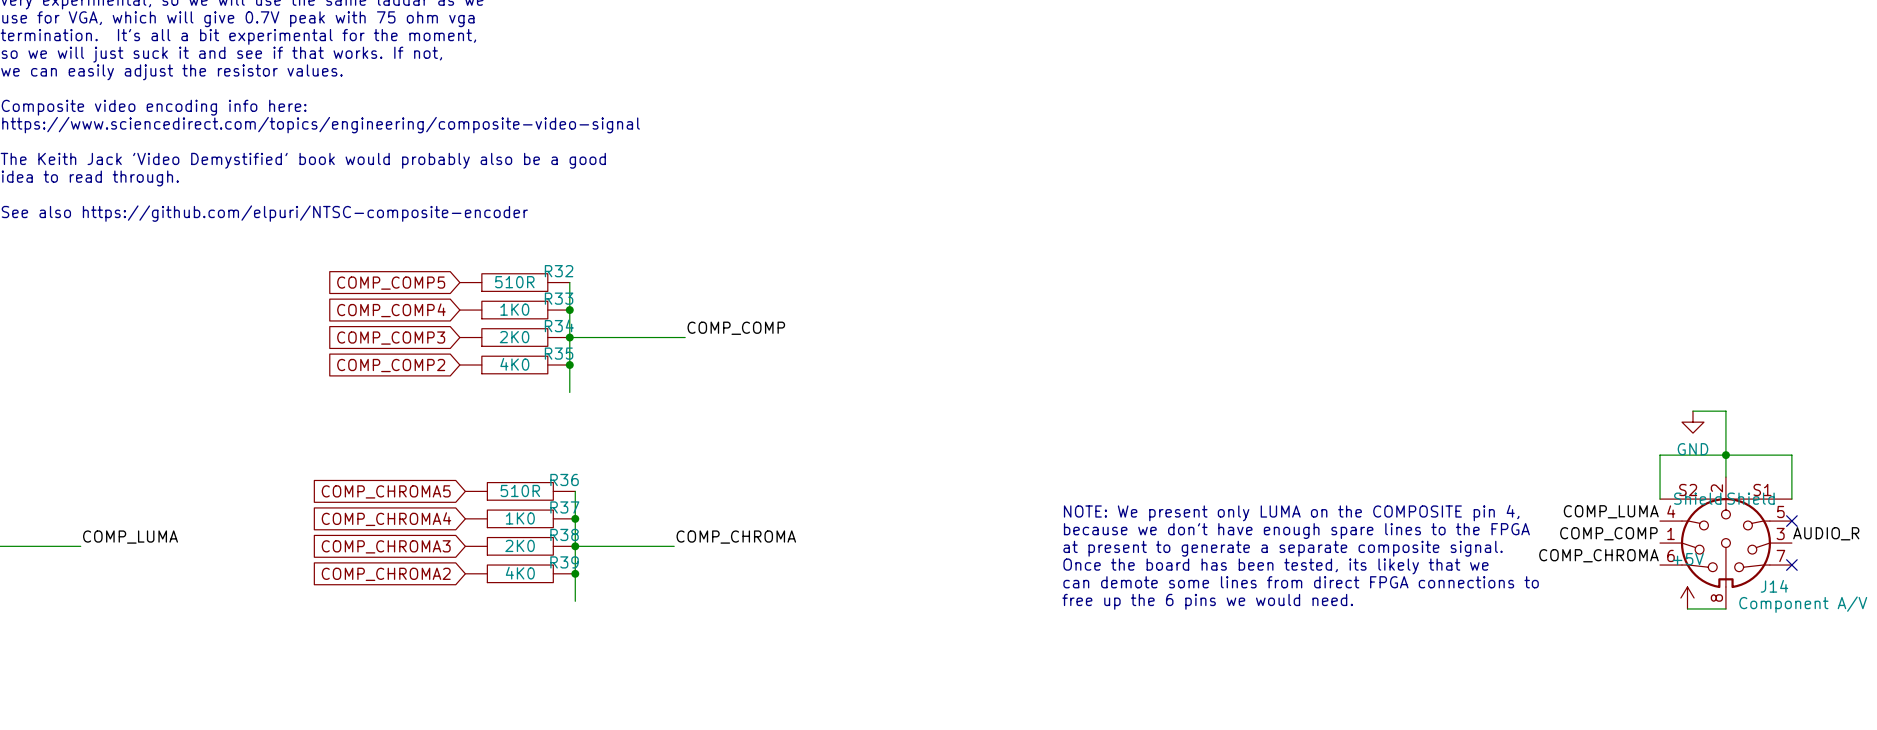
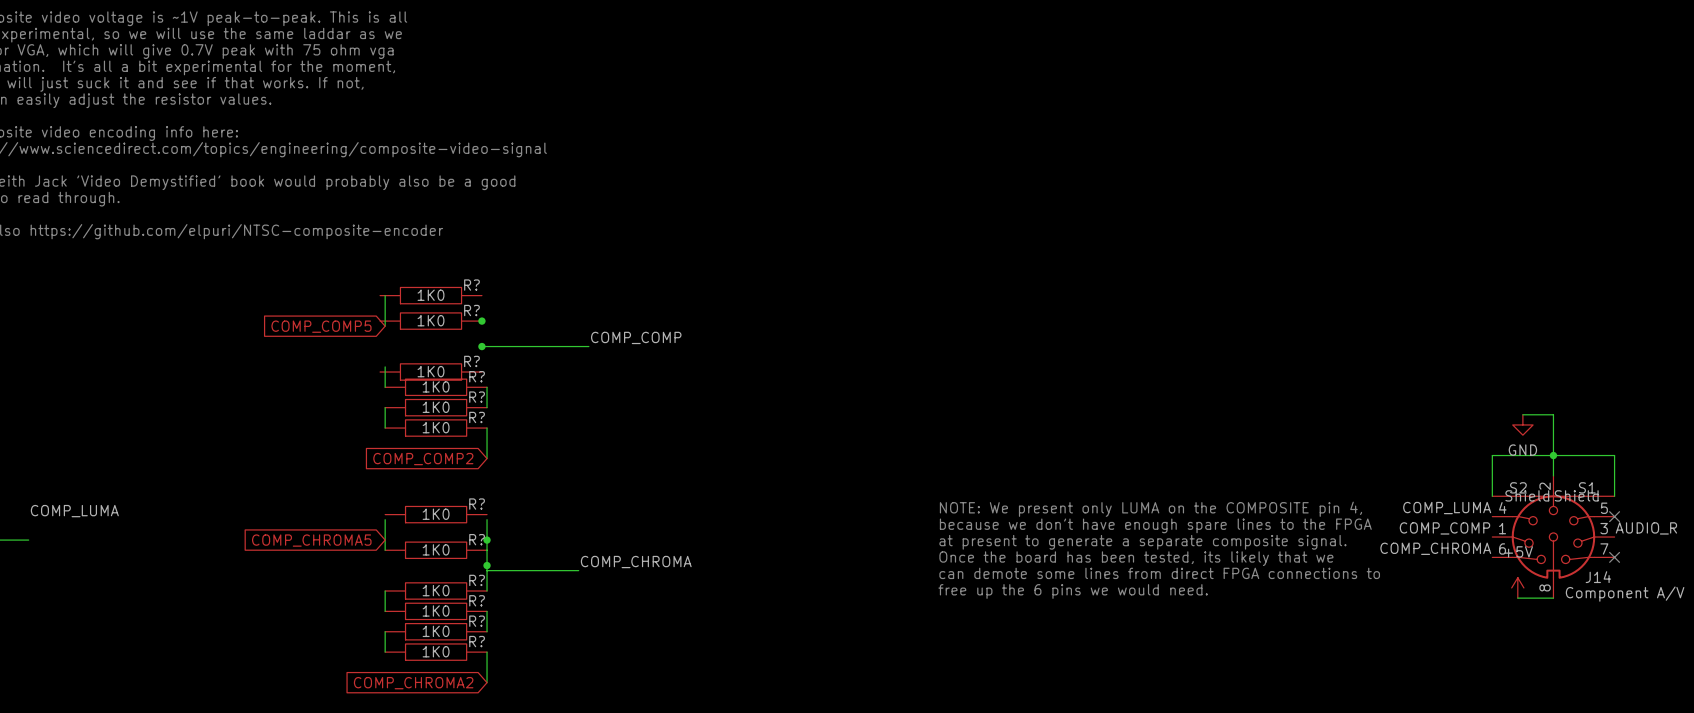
R32 name: R32 (559, 271) -> R? (471, 285)
wire: none -> (385, 295) (385, 326)
R32 value: 510R (514, 282) -> 1K0 (431, 295)
wire: (569, 282) (569, 392) -> none
global label position: COMP_COMP5 (391, 283) -> COMP_COMP5 (321, 326)
R33 name: R33 (559, 298) -> R? (471, 310)
global label: COMP_COMP4 (391, 310) -> none
R34: 2K0 (514, 337) -> none
global label: COMP_COMP3 (391, 338) -> none
R35 name: R35 (559, 353) -> R? (471, 361)
wire: none -> (385, 366) (385, 387)
R35 value: 4K0 (514, 364) -> 1K0 (431, 371)
global label position: COMP_COMP2 (391, 365) -> COMP_COMP2 (423, 459)
junction: (569, 365) -> none
R?: none -> 1K0 (436, 387)
wire: none -> (487, 387) (487, 407)
wire: none -> (385, 407) (385, 428)
R?: none -> 1K0 (436, 407)
R?: none -> 1K0 (436, 428)
global label: COMP_CHROMA5 (386, 491) -> none
R36: 510R (520, 491) -> none
wire: (575, 491) (575, 524) -> (487, 428) (487, 458)
R37 name: R37 (564, 507) -> R? (477, 504)
junction: (575, 518) -> none
global label: COMP_CHROMA4 (386, 519) -> none
wire: none -> (385, 519) (385, 550)
label position: COMP_LUMA (130, 537) -> COMP_LUMA (74, 511)
label position: COMP_CHROMA (736, 537) -> COMP_CHROMA (636, 562)
global label: COMP_CHROMA3 (386, 546) -> COMP_CHROMA5 (311, 540)
R38: 2K0 (520, 546) -> none
wire: (575, 546) (674, 546) -> (487, 570) (578, 570)
R?: none -> 1K0 (436, 550)
R39: 4K0 (520, 573) -> none
global label position: COMP_CHROMA2 (386, 574) -> COMP_CHROMA2 (413, 683)
wire: none -> (385, 591) (385, 611)
R?: none -> 1K0 (436, 591)
R?: none -> 1K0 (436, 611)
wire: none -> (487, 611) (487, 631)
wire: none -> (385, 631) (385, 652)
R?: none -> 1K0 (436, 631)
R?: none -> 1K0 (436, 652)
wire: none -> (487, 652) (487, 682)

